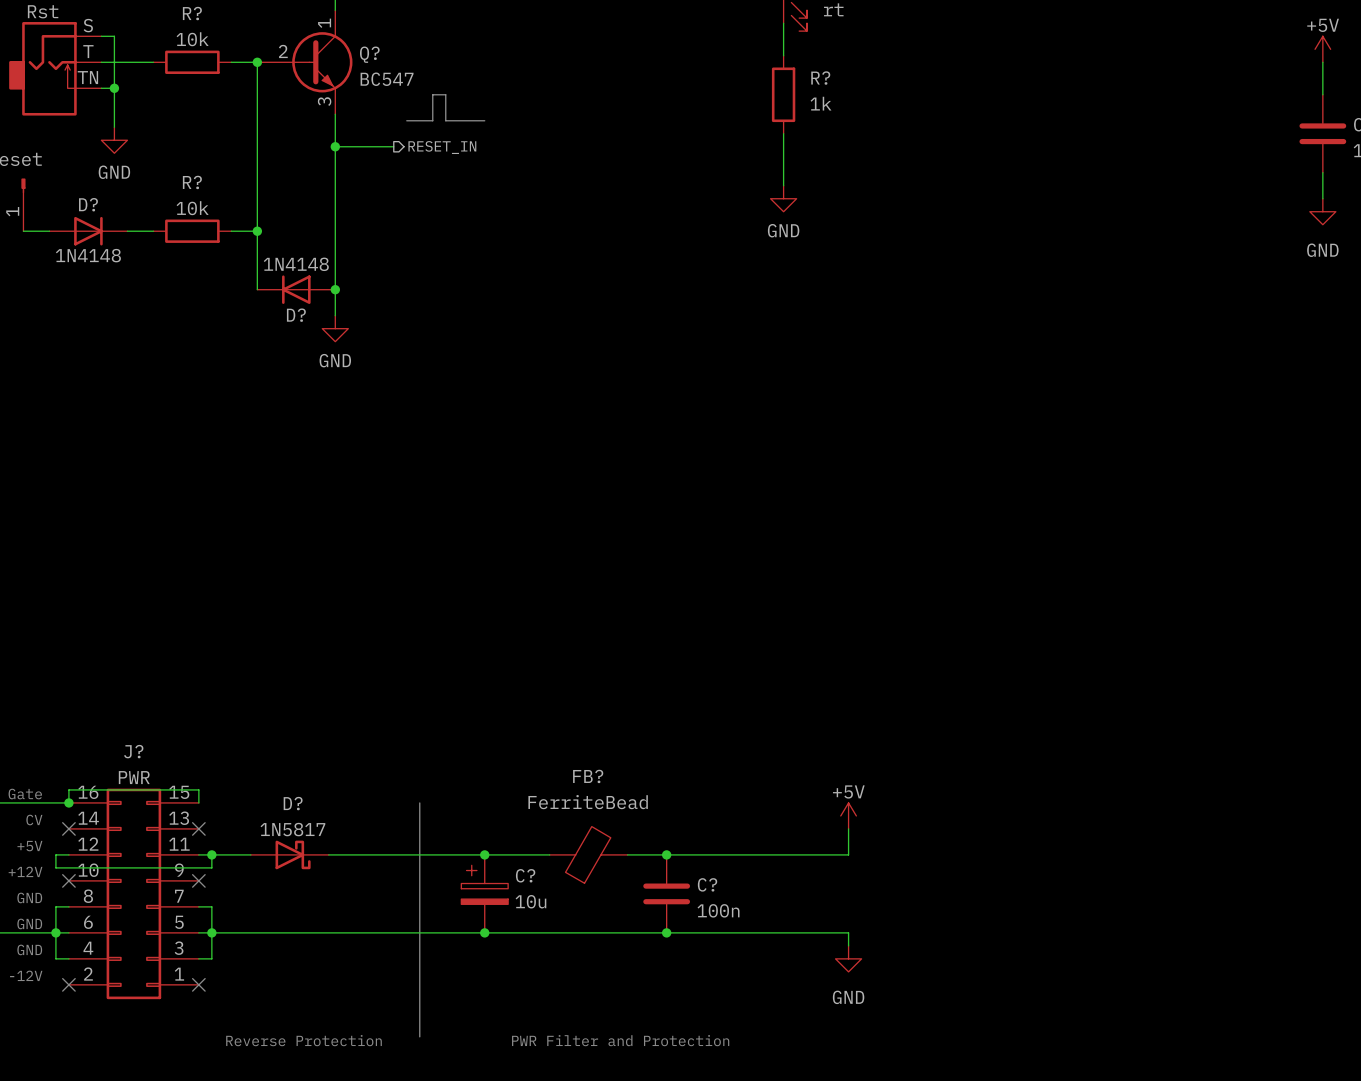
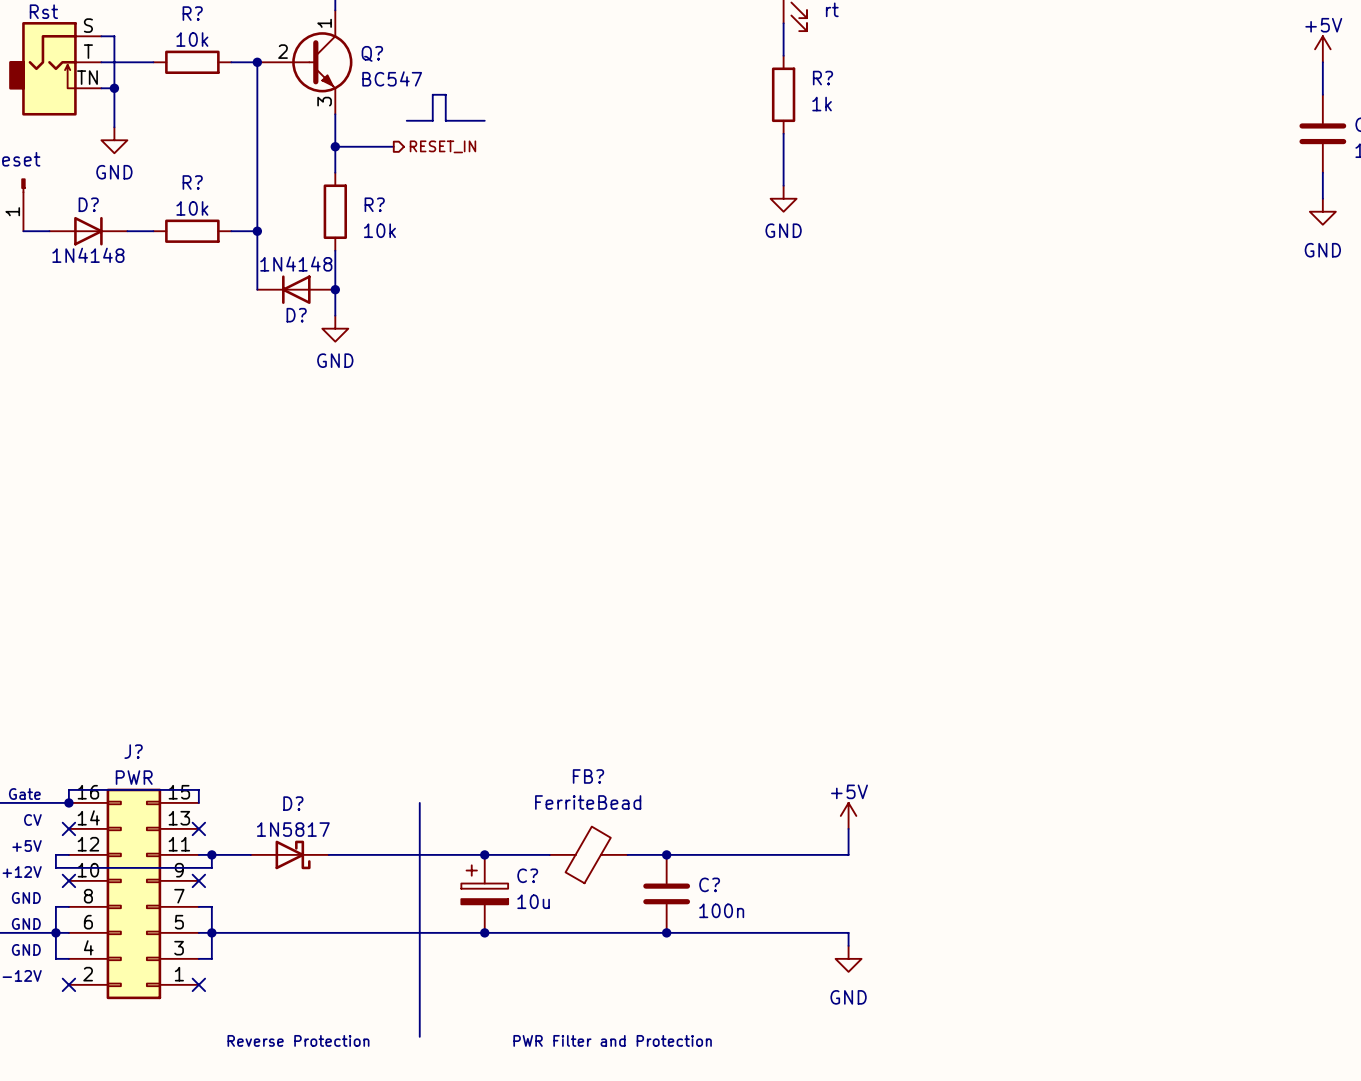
wire: (335, 172) (335, 250) -> none
R?: none -> 10k (335, 211)

